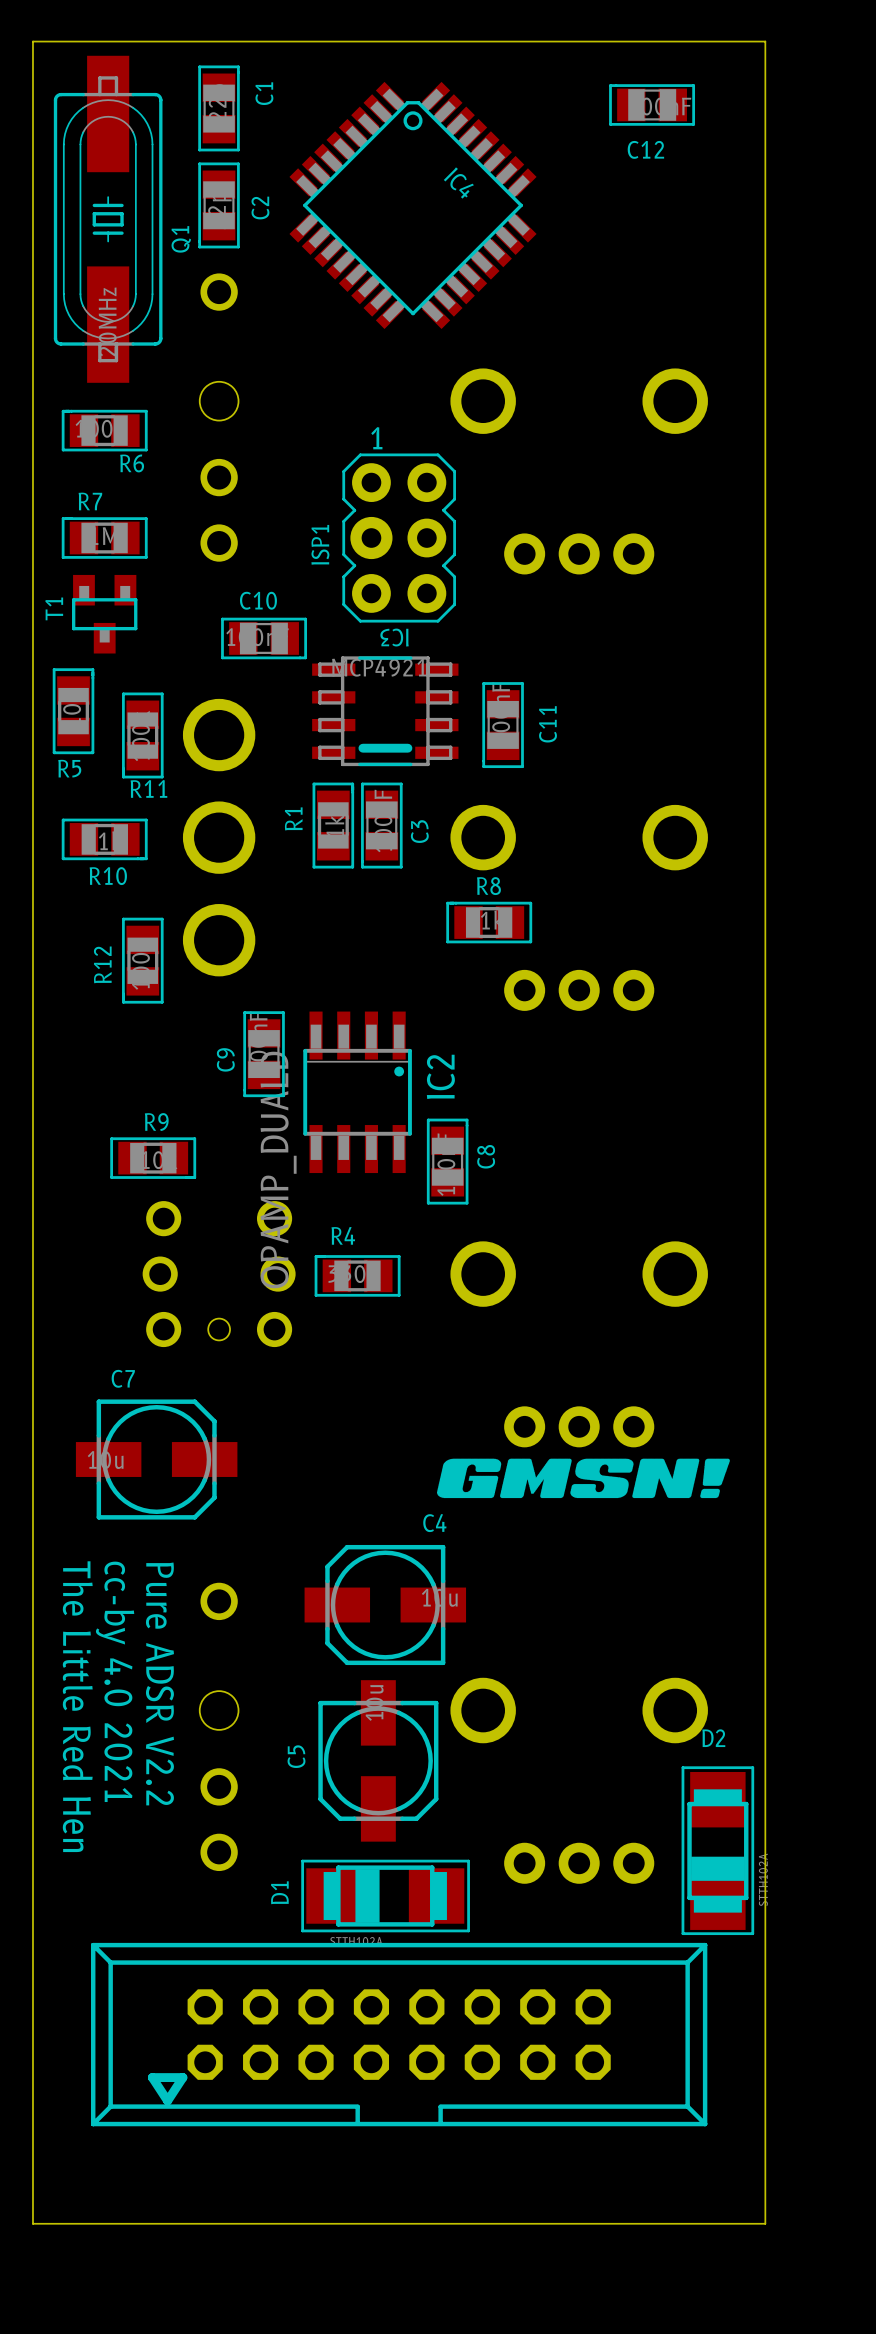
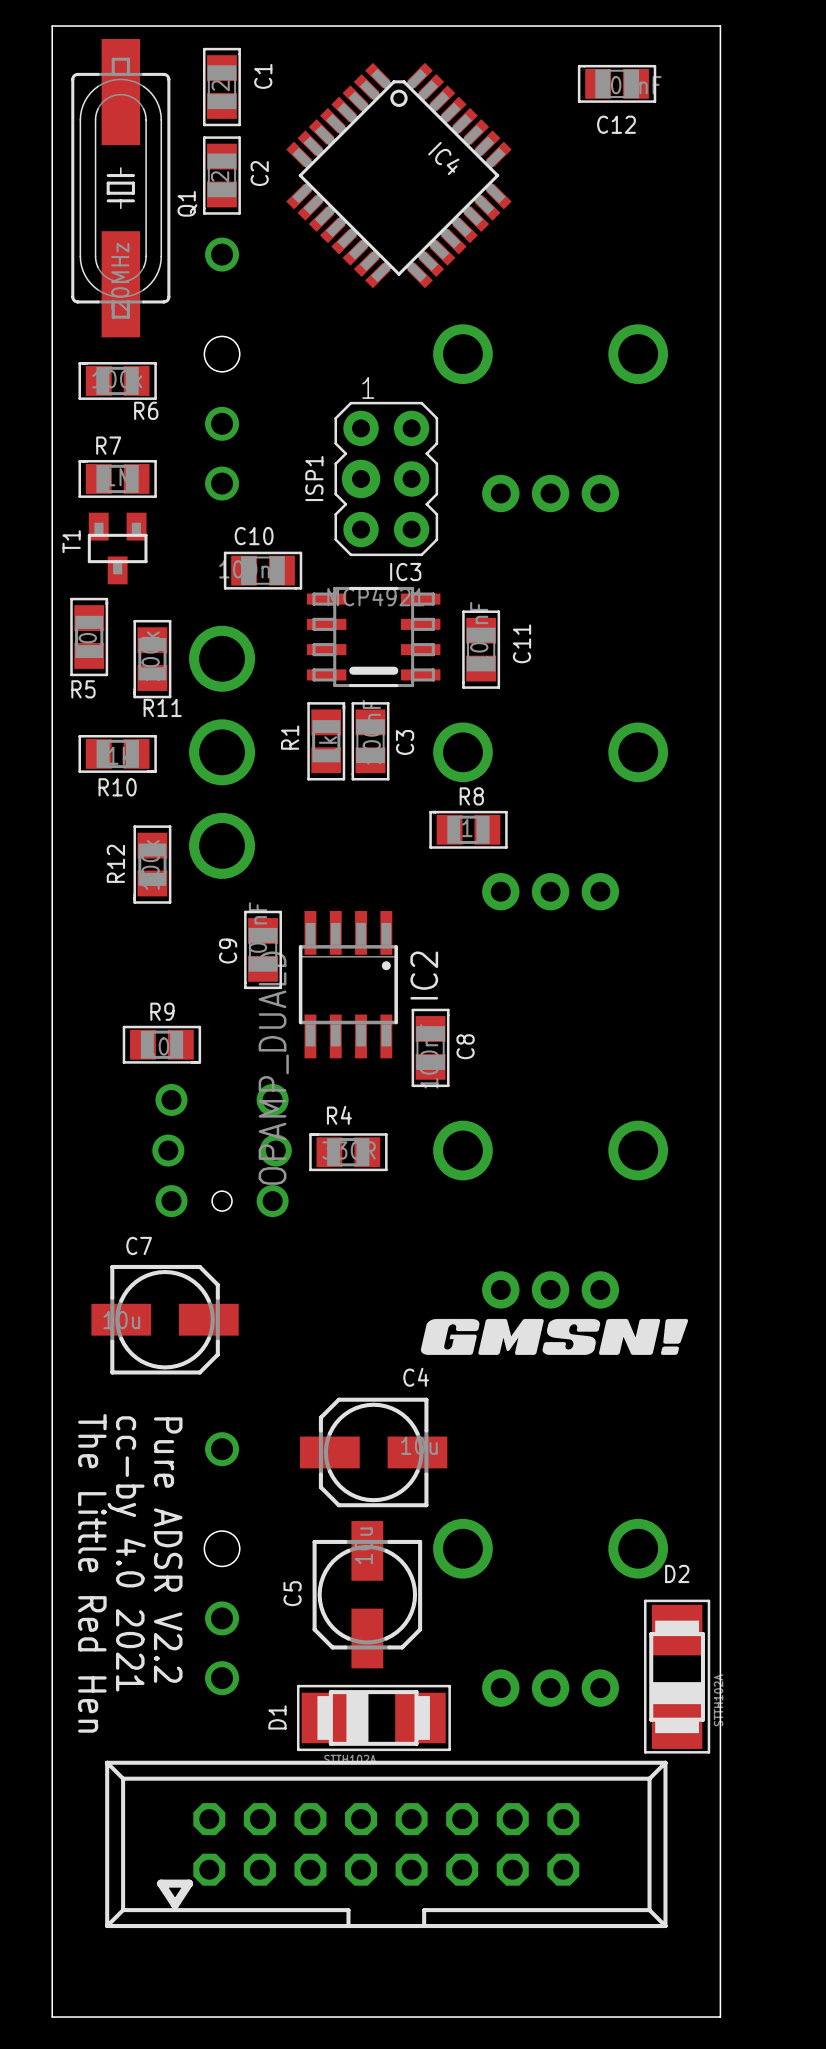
IC3 name rotation: 0° (394, 637) -> 180° (405, 572)

